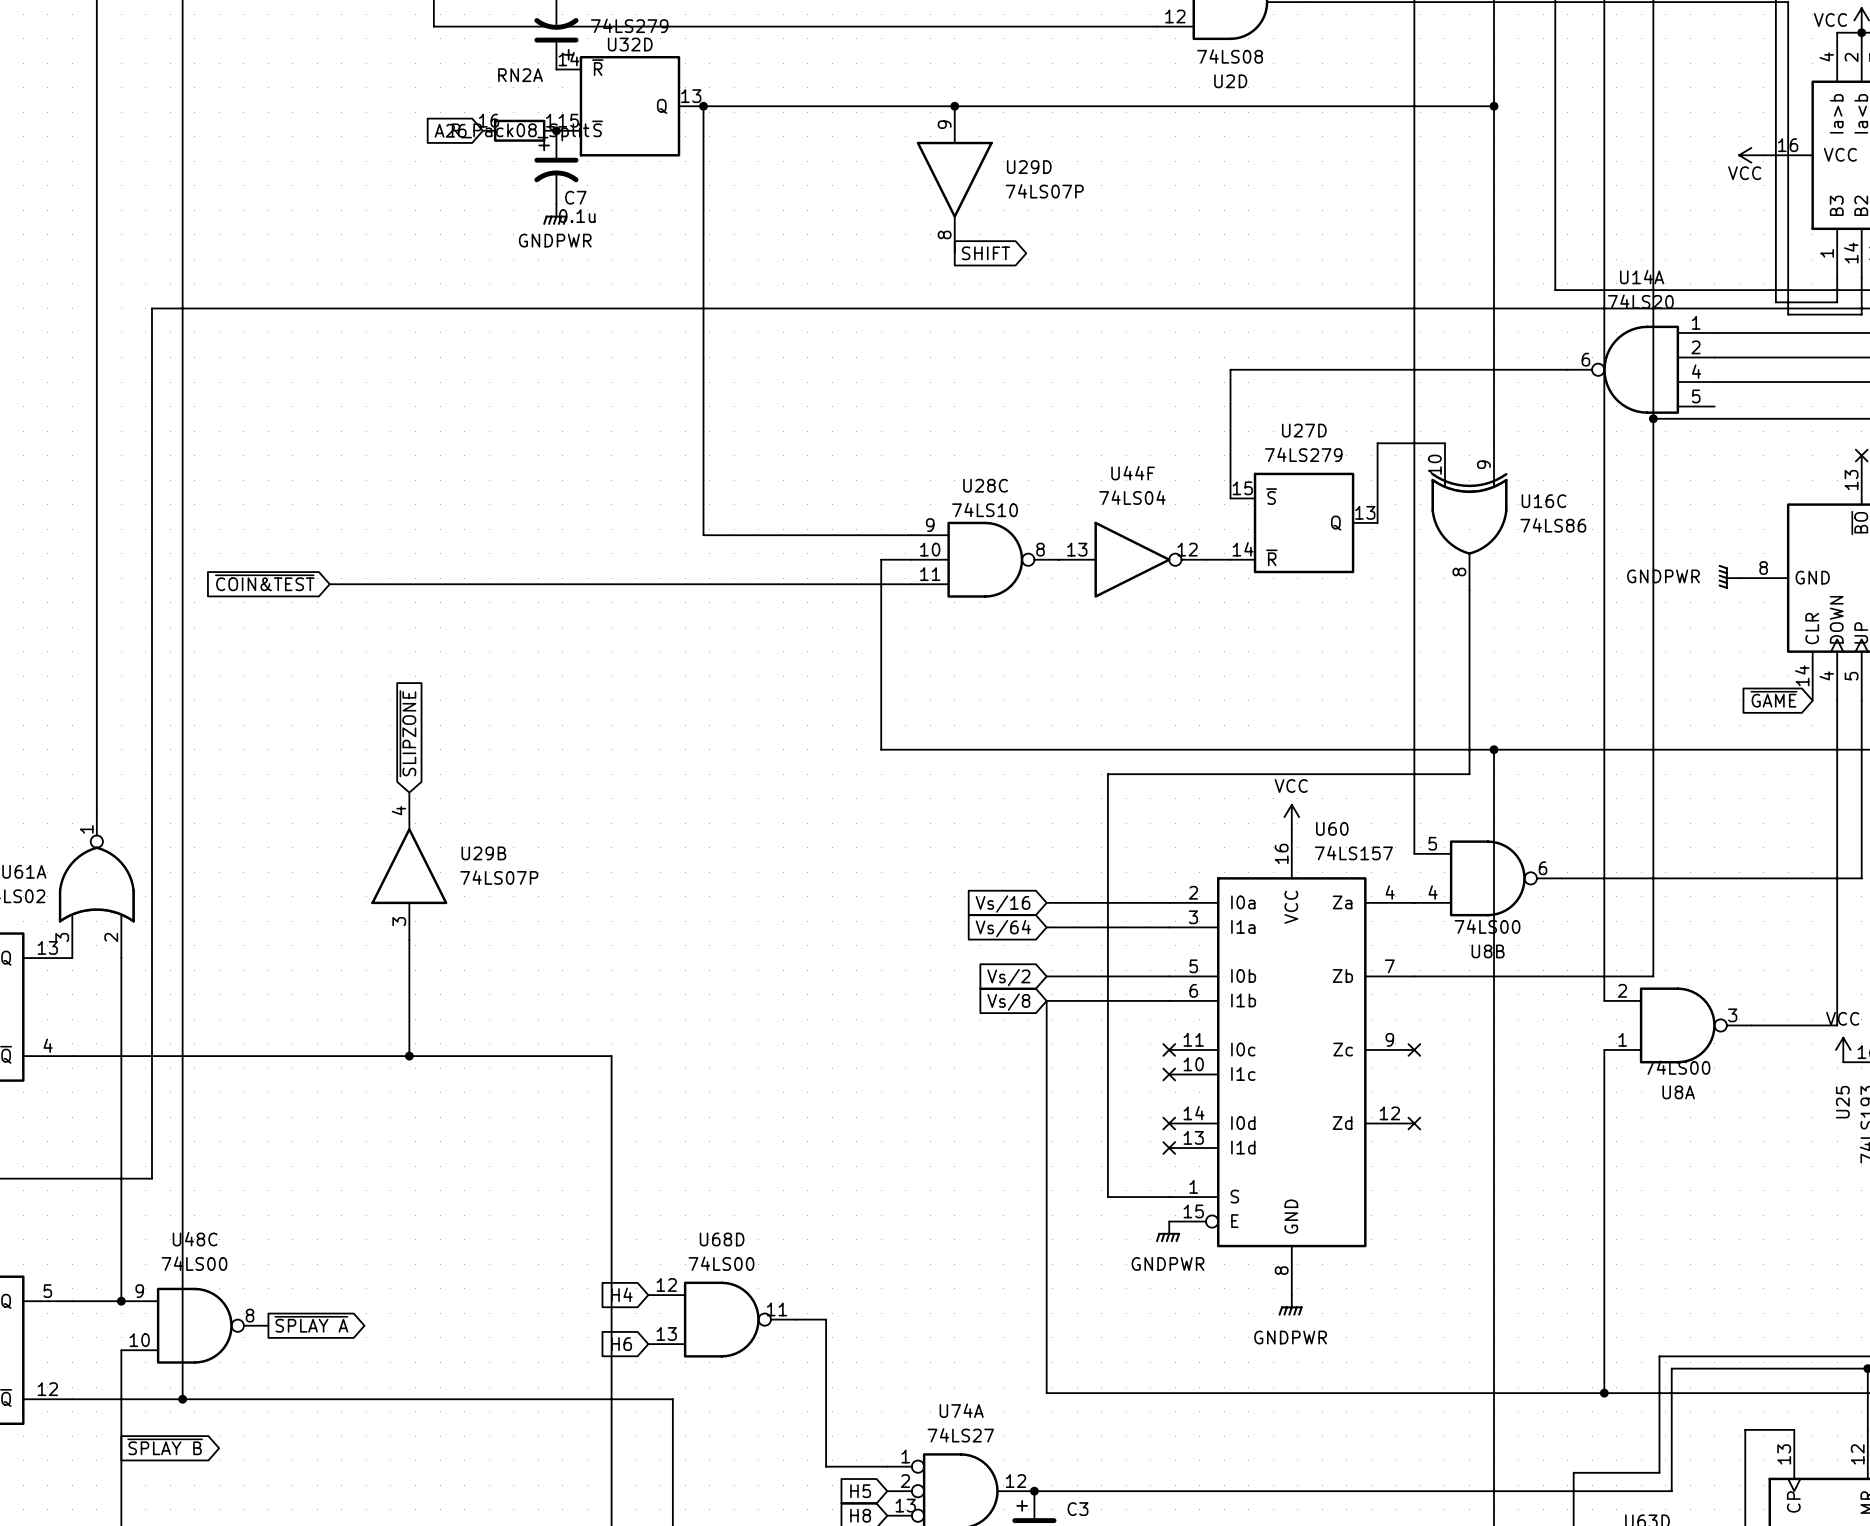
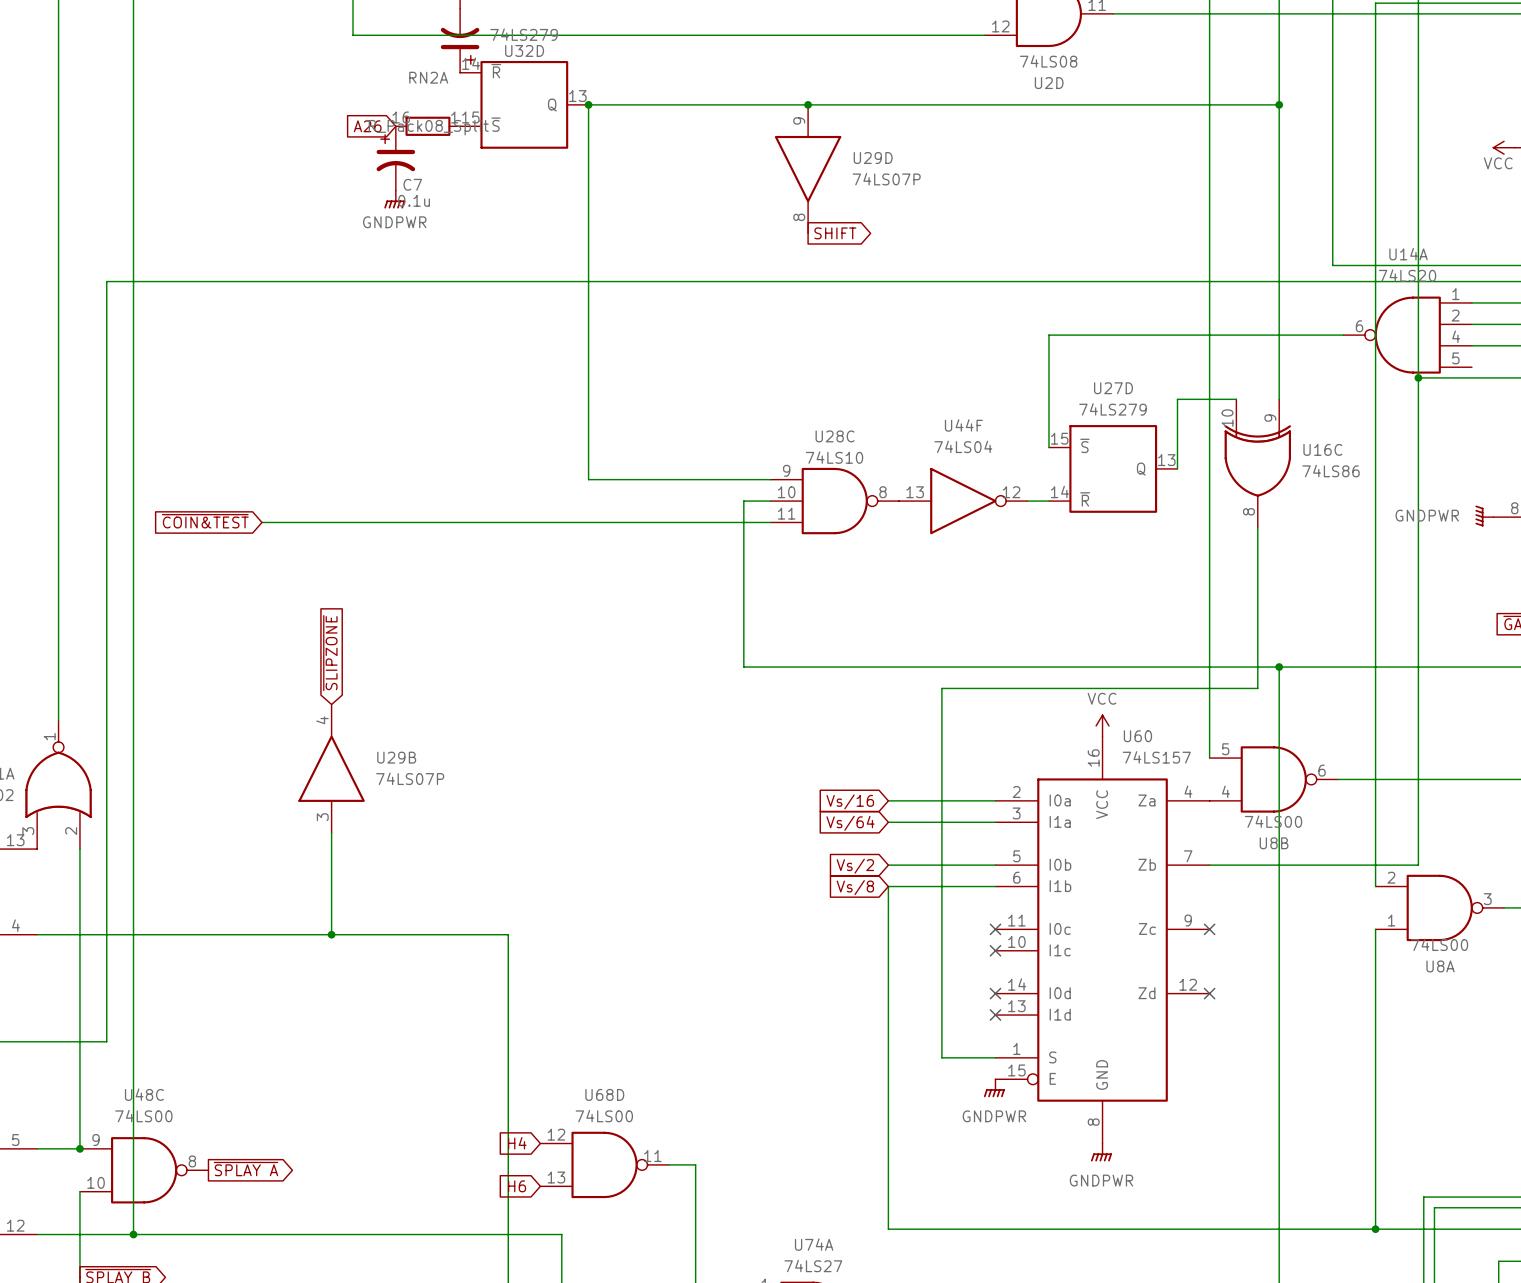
junction: (556, 130) -> none
C7 position: (556, 167) -> (395, 158)
power symbol position: GNDPWR (555, 214) -> GNDPWR (394, 199)

